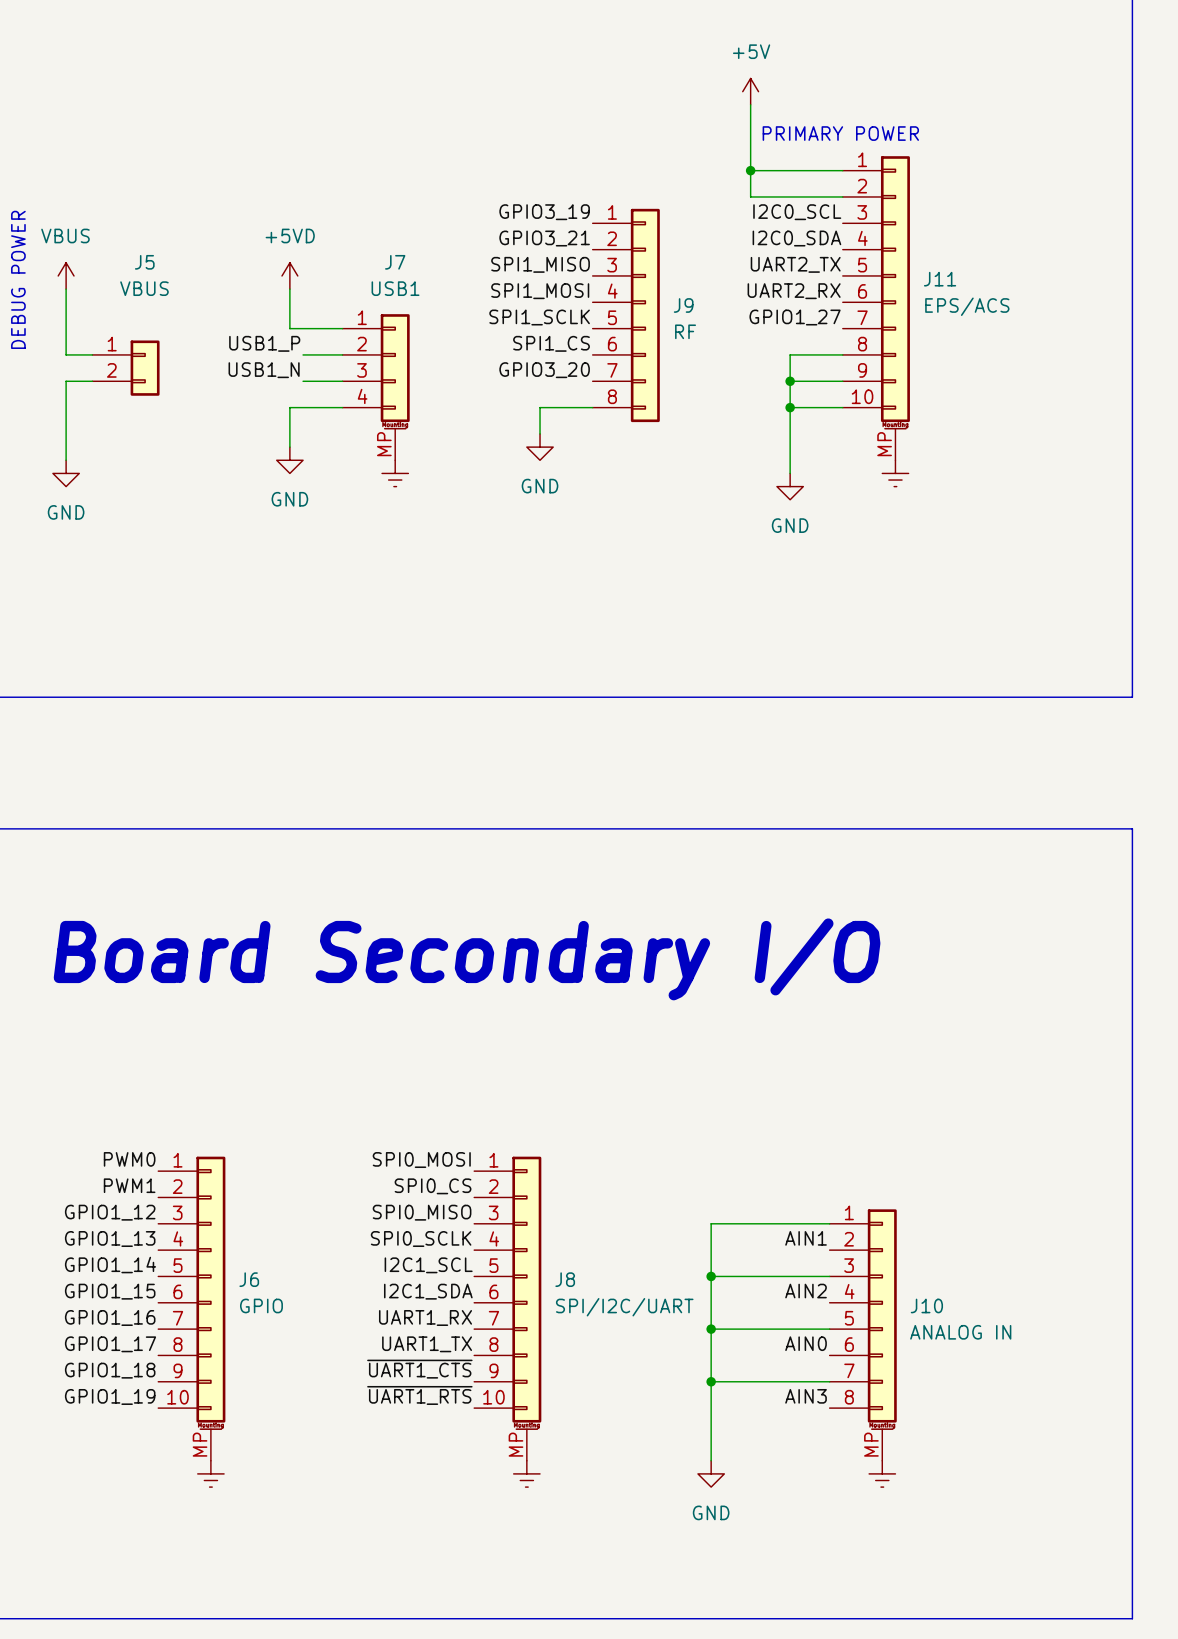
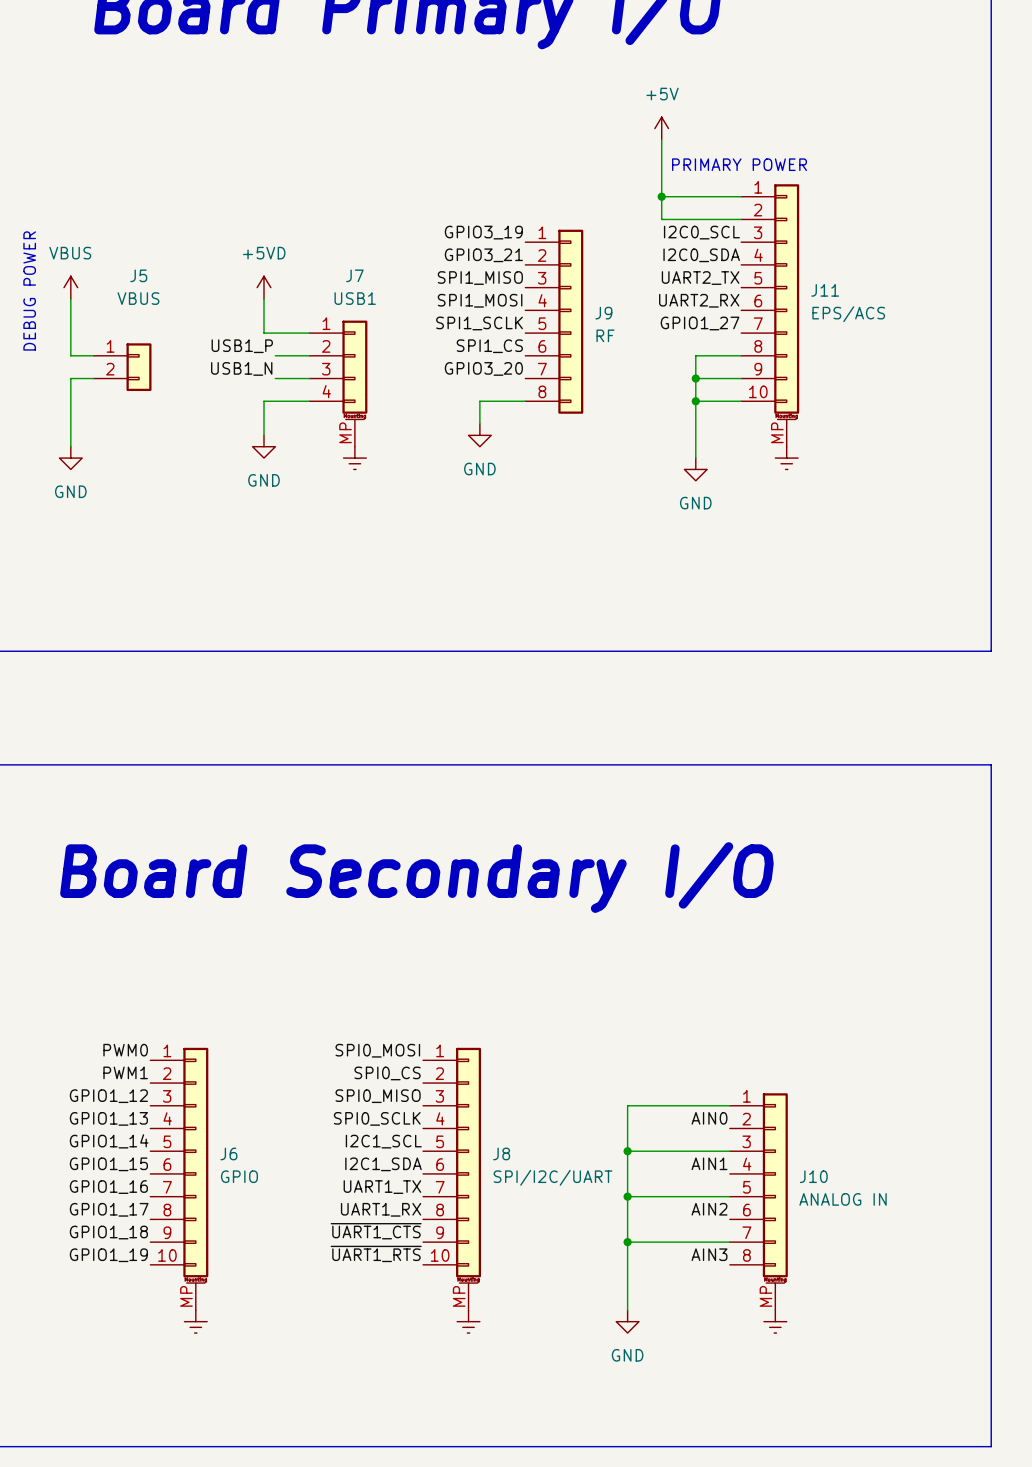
label: AIN1 (806, 1238) -> AIN0 (709, 1118)
label: AIN2 (806, 1291) -> AIN1 (709, 1163)
label: UART1_RX (425, 1317) -> UART1_TX (382, 1187)
label: AIN0 (806, 1343) -> AIN2 (709, 1209)
label: UART1_TX (427, 1344) -> UART1_RX (381, 1209)

